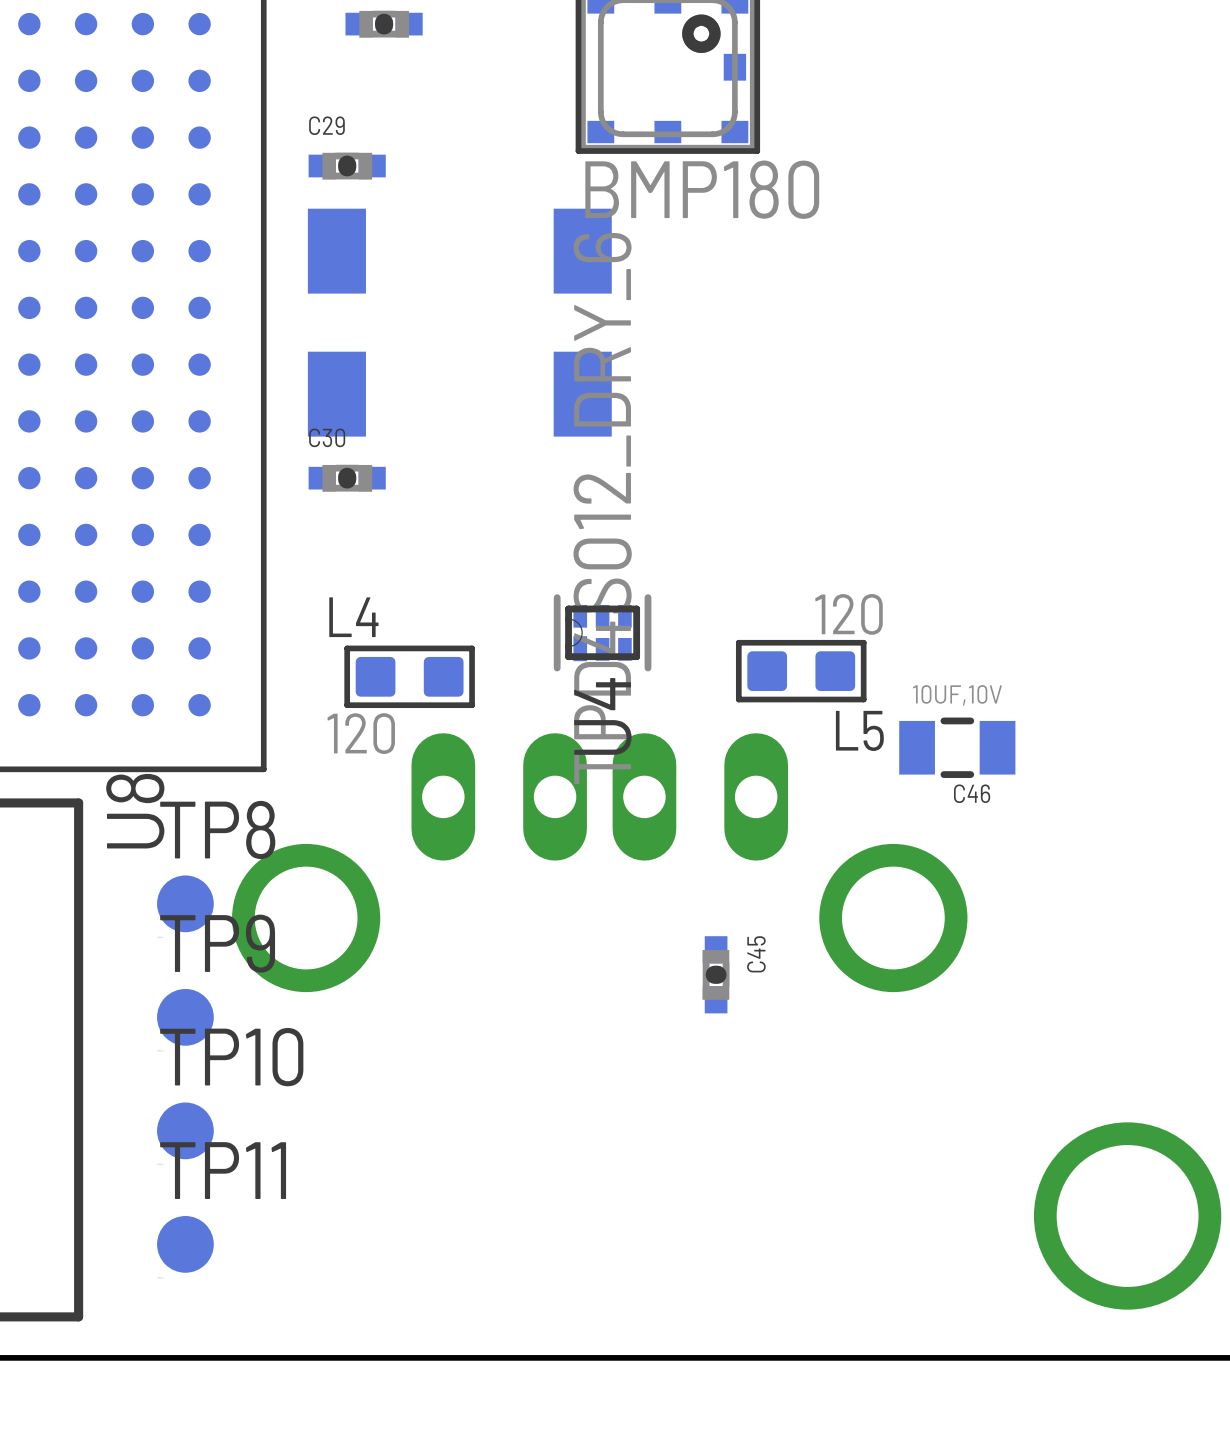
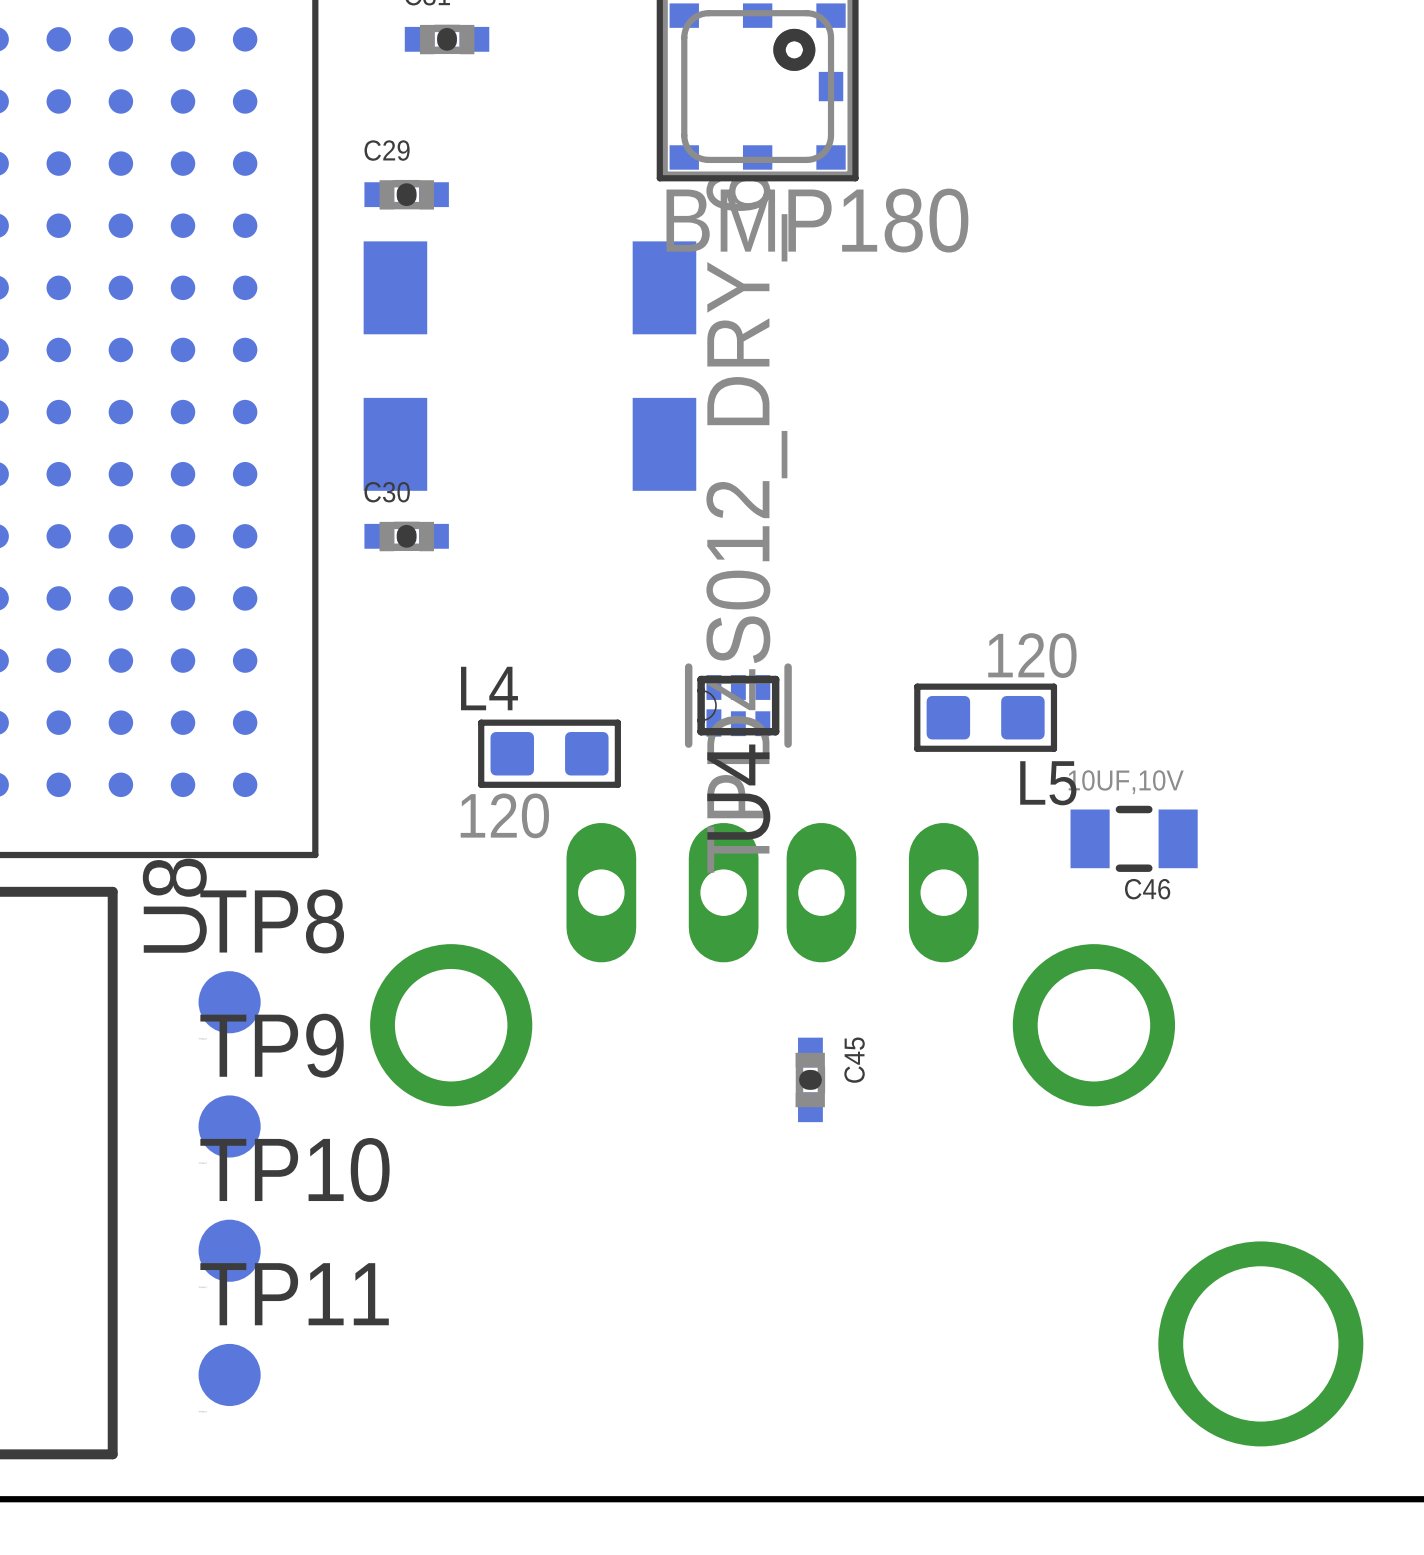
U4 position: (602, 632) -> (738, 705)
L5 position: (801, 671) -> (985, 717)
L4 position: (409, 676) -> (549, 753)
C46 position: (957, 747) -> (1134, 838)
part position: (599, 862) -> (772, 964)

